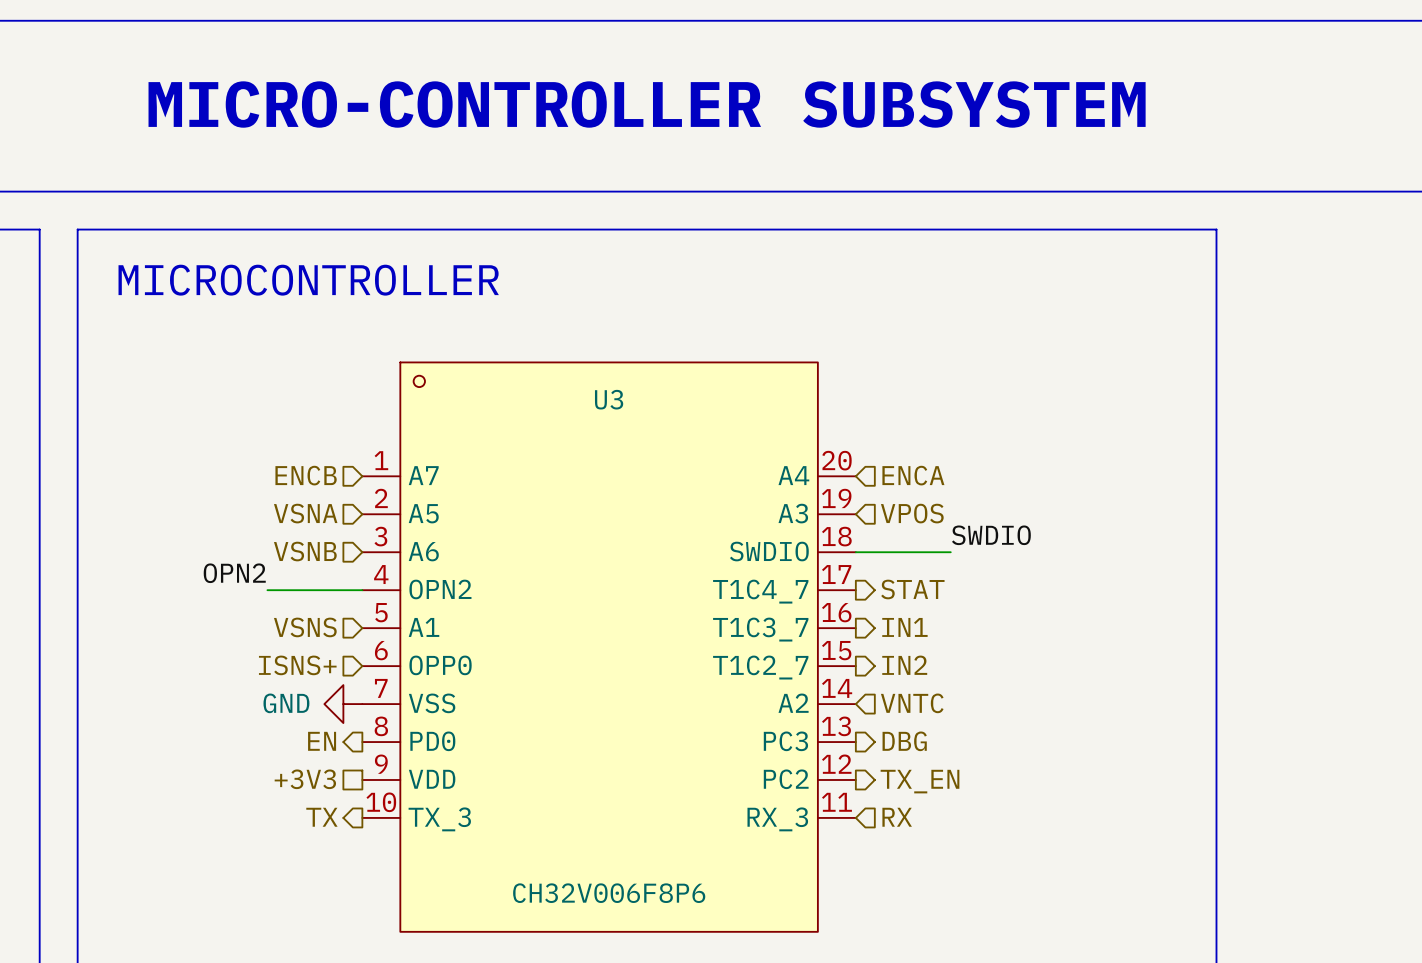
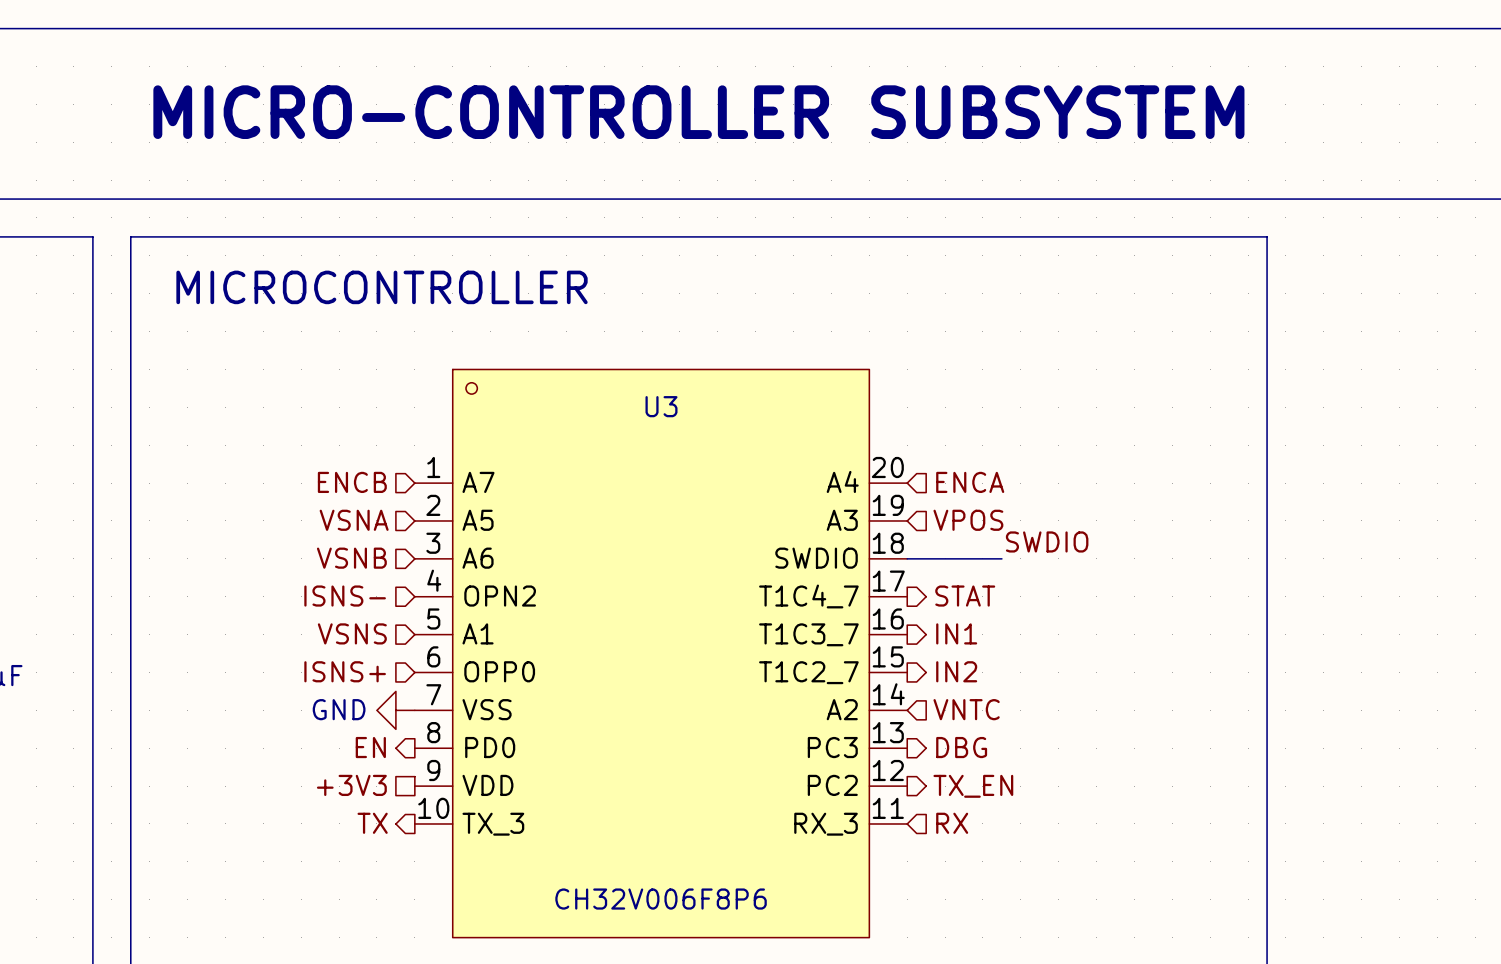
label: OPN2 (234, 573) -> none
hierarchical label: none -> ISNS- (345, 596)
wire: (267, 590) (362, 590) -> none

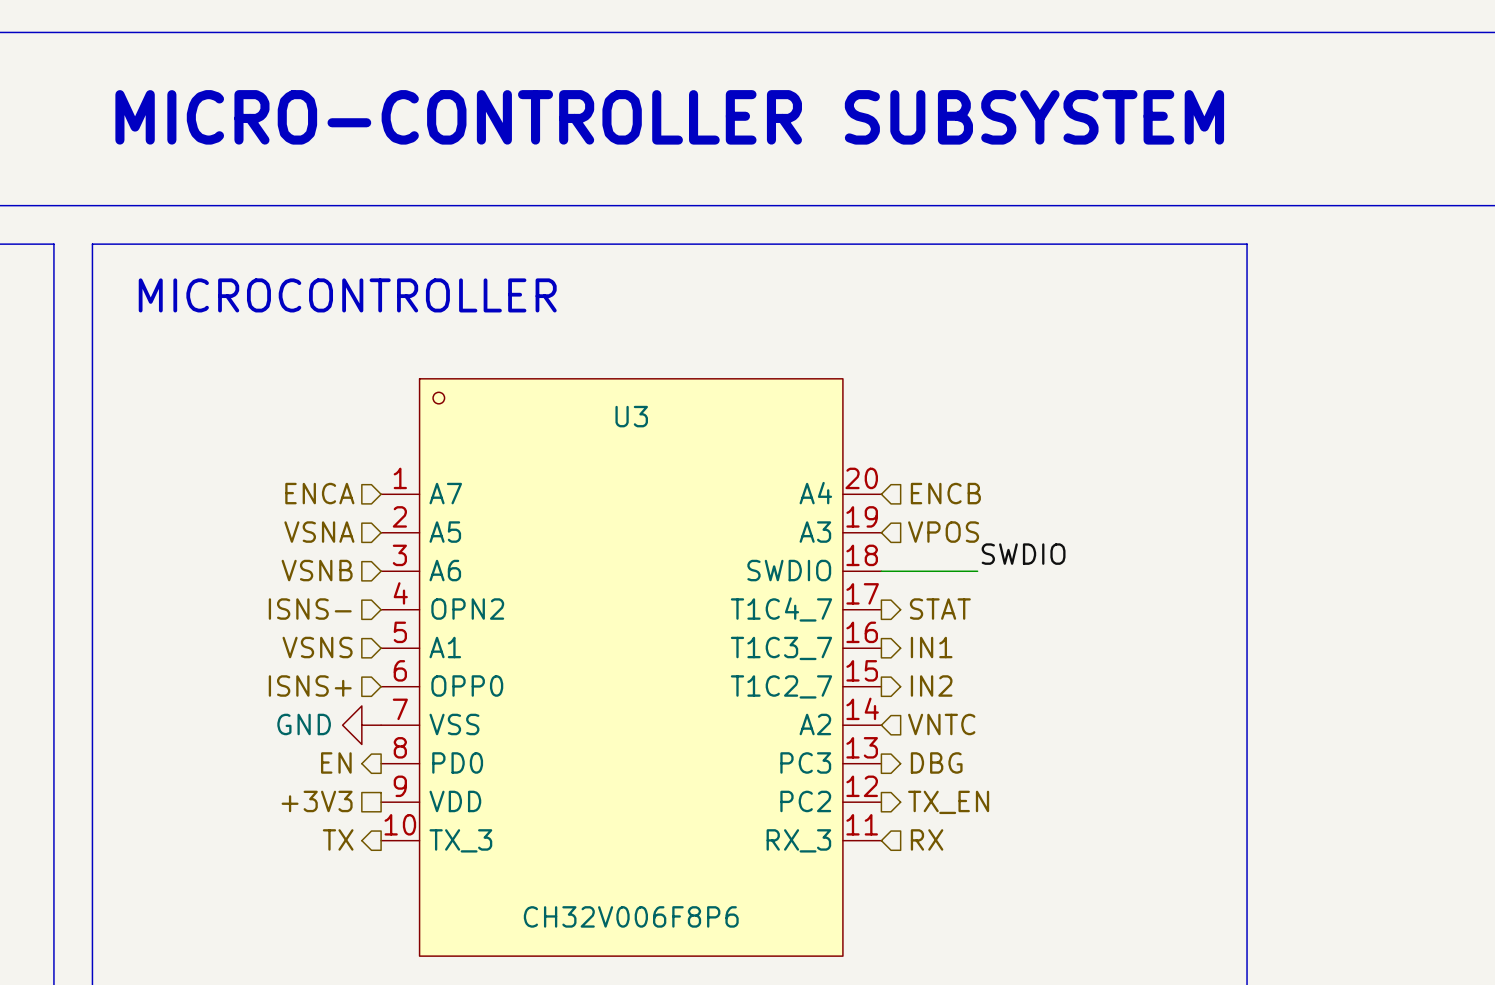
hierarchical label: ENCB (352, 482) -> ENCA (319, 493)
hierarchical label: ENCA (970, 482) -> ENCB (945, 493)

